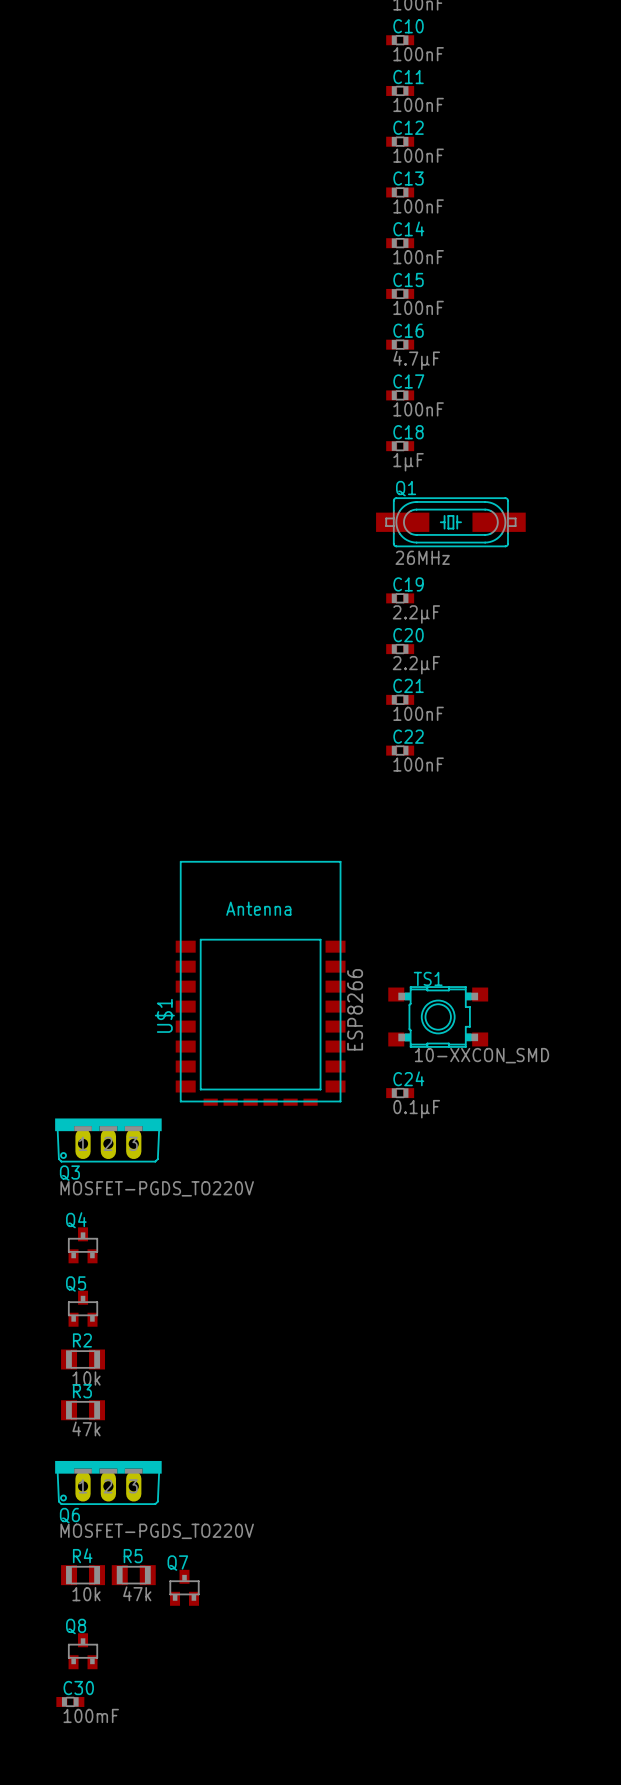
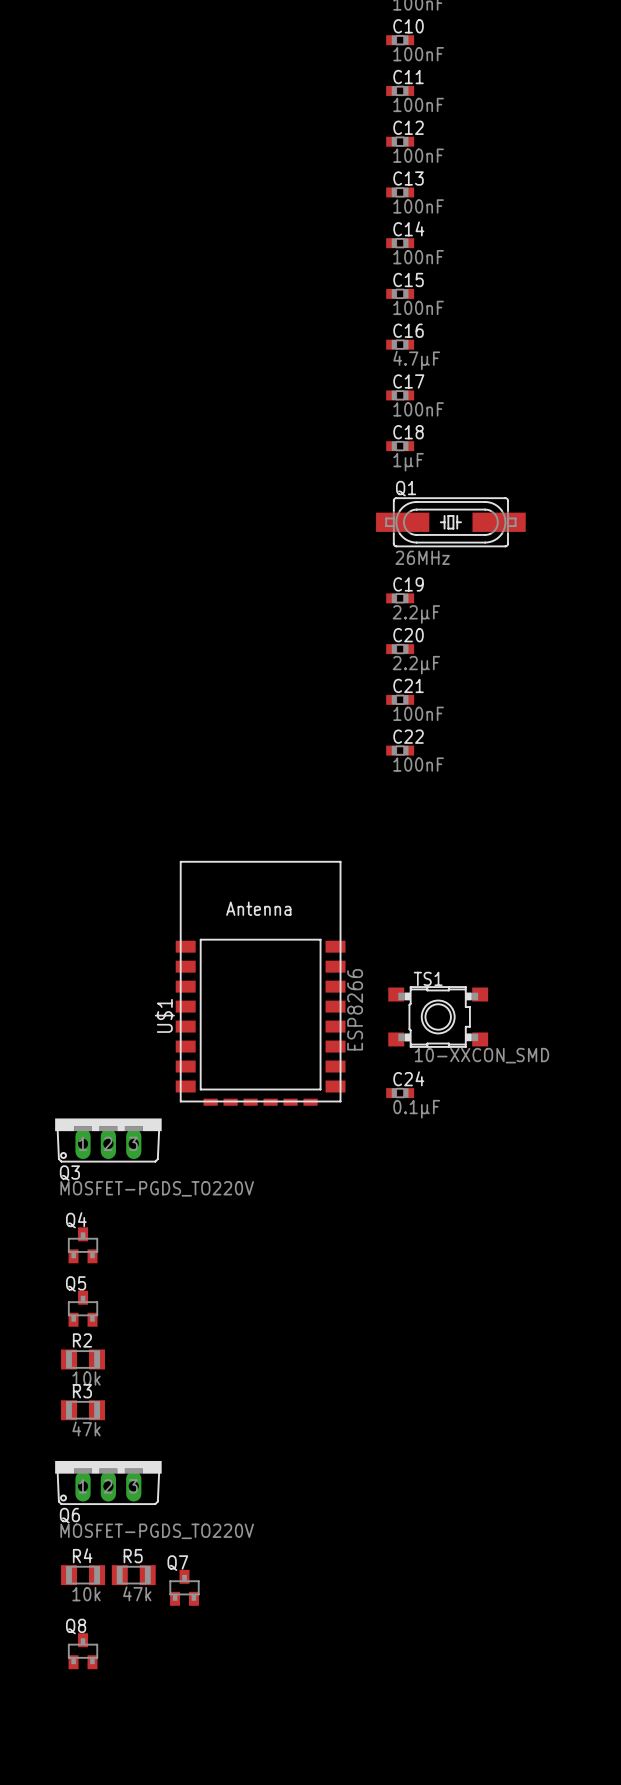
C30: 100mF (70, 1701) -> none

